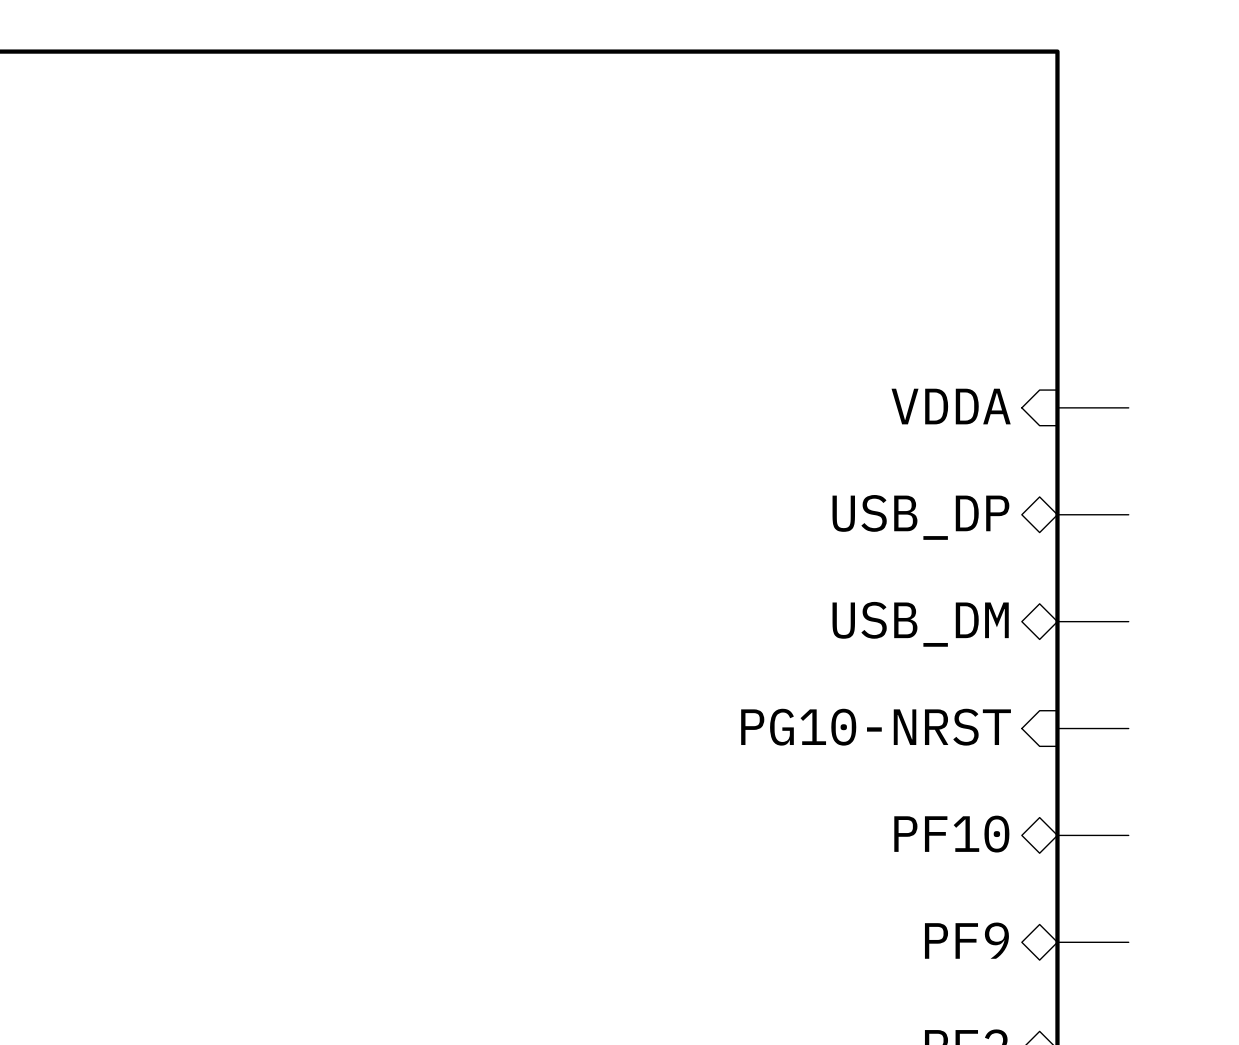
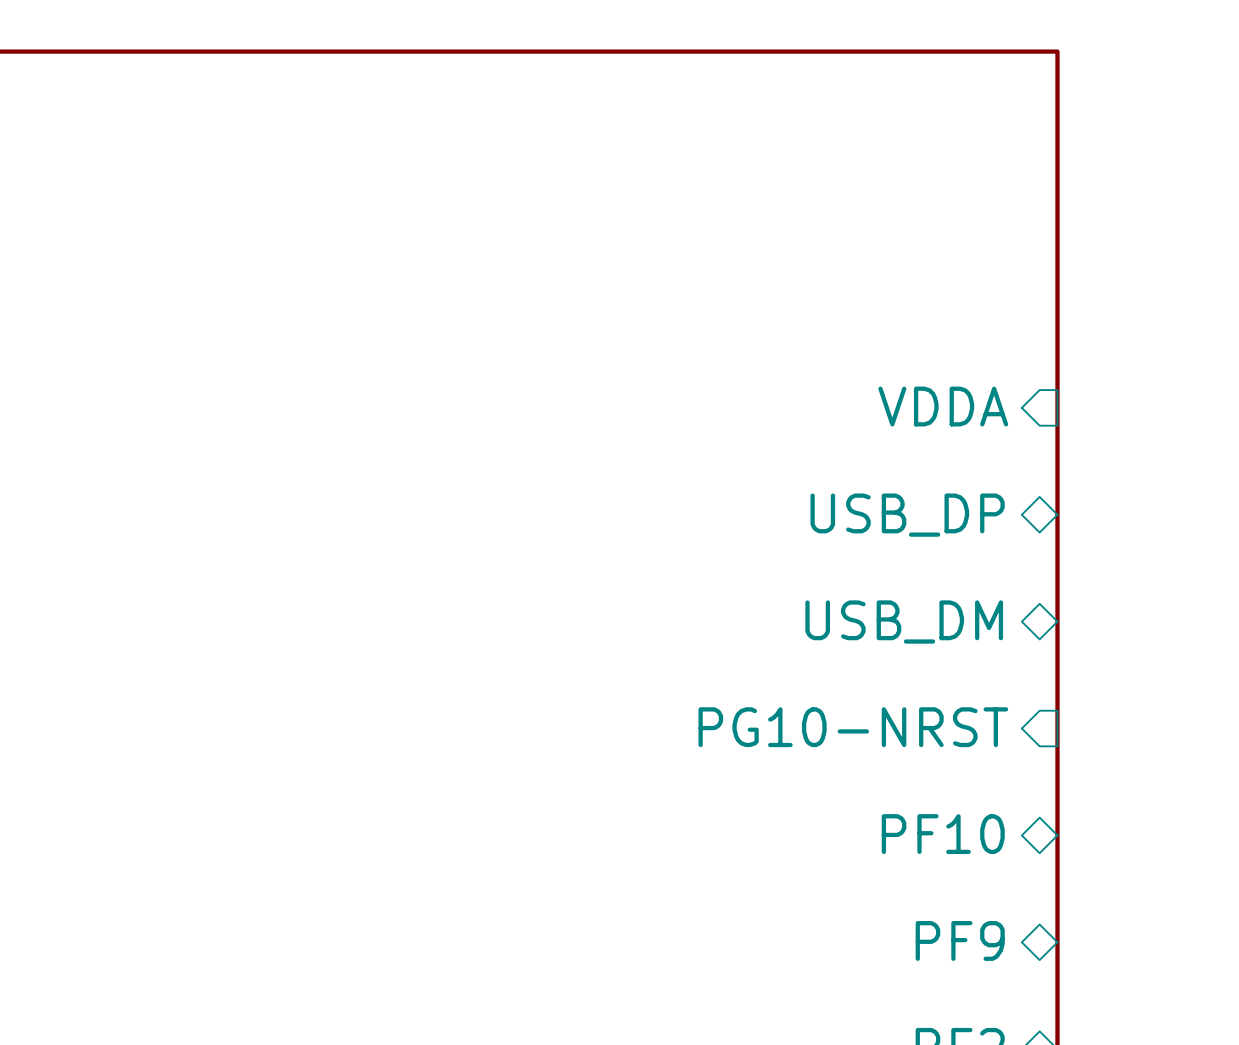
wire: (1057, 407) (1128, 407) -> none
wire: (1057, 514) (1128, 514) -> none
wire: (1057, 621) (1128, 621) -> none
wire: (1057, 728) (1128, 728) -> none
wire: (1057, 835) (1128, 835) -> none
wire: (1057, 942) (1128, 942) -> none

